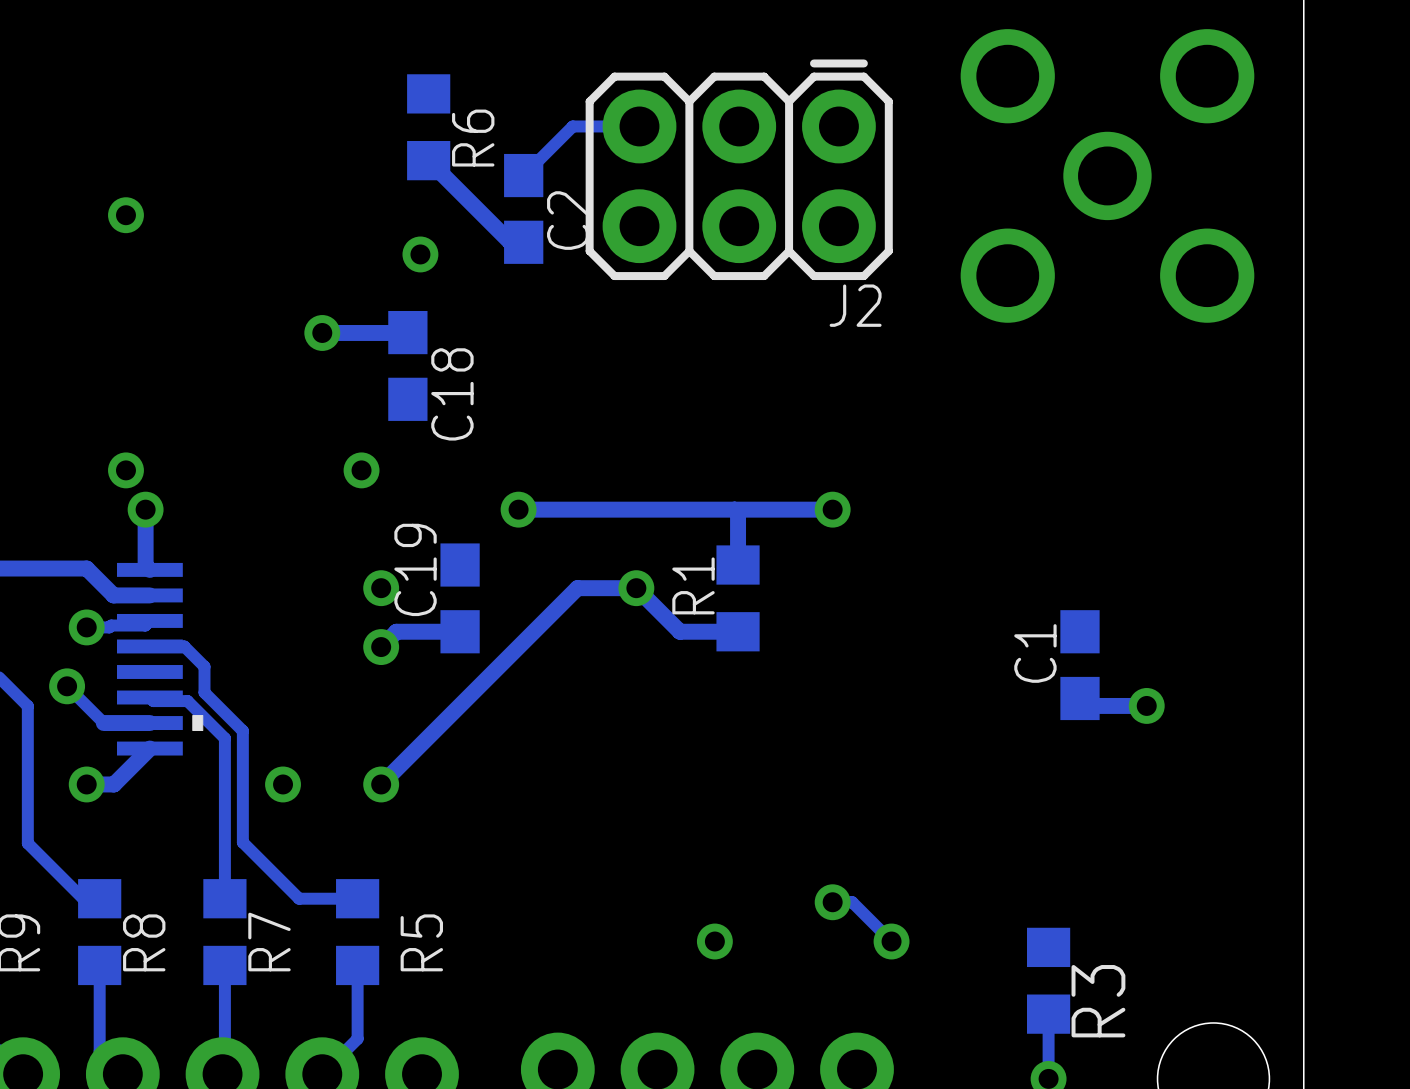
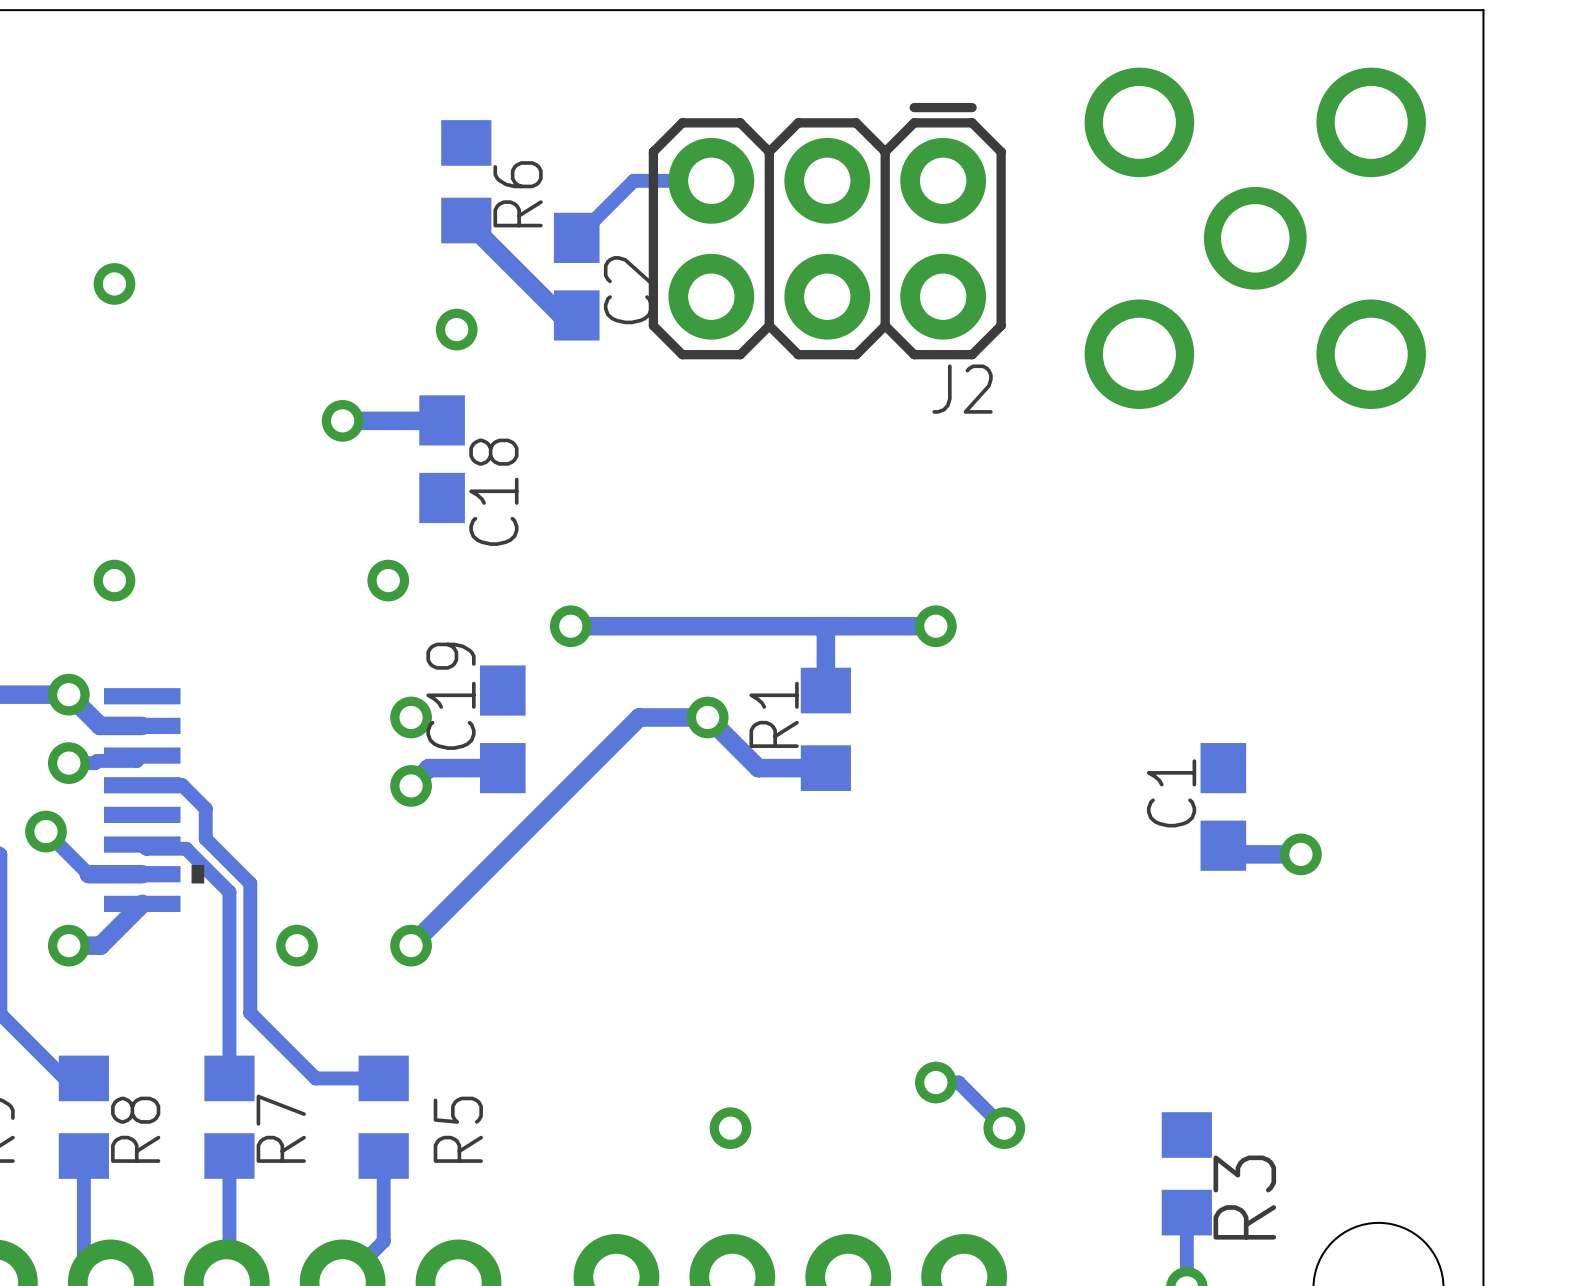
track: (145, 509) (145, 565) (149, 569) -> none
via position: (145, 509) -> (68, 694)
via position: (714, 941) -> (730, 1128)

